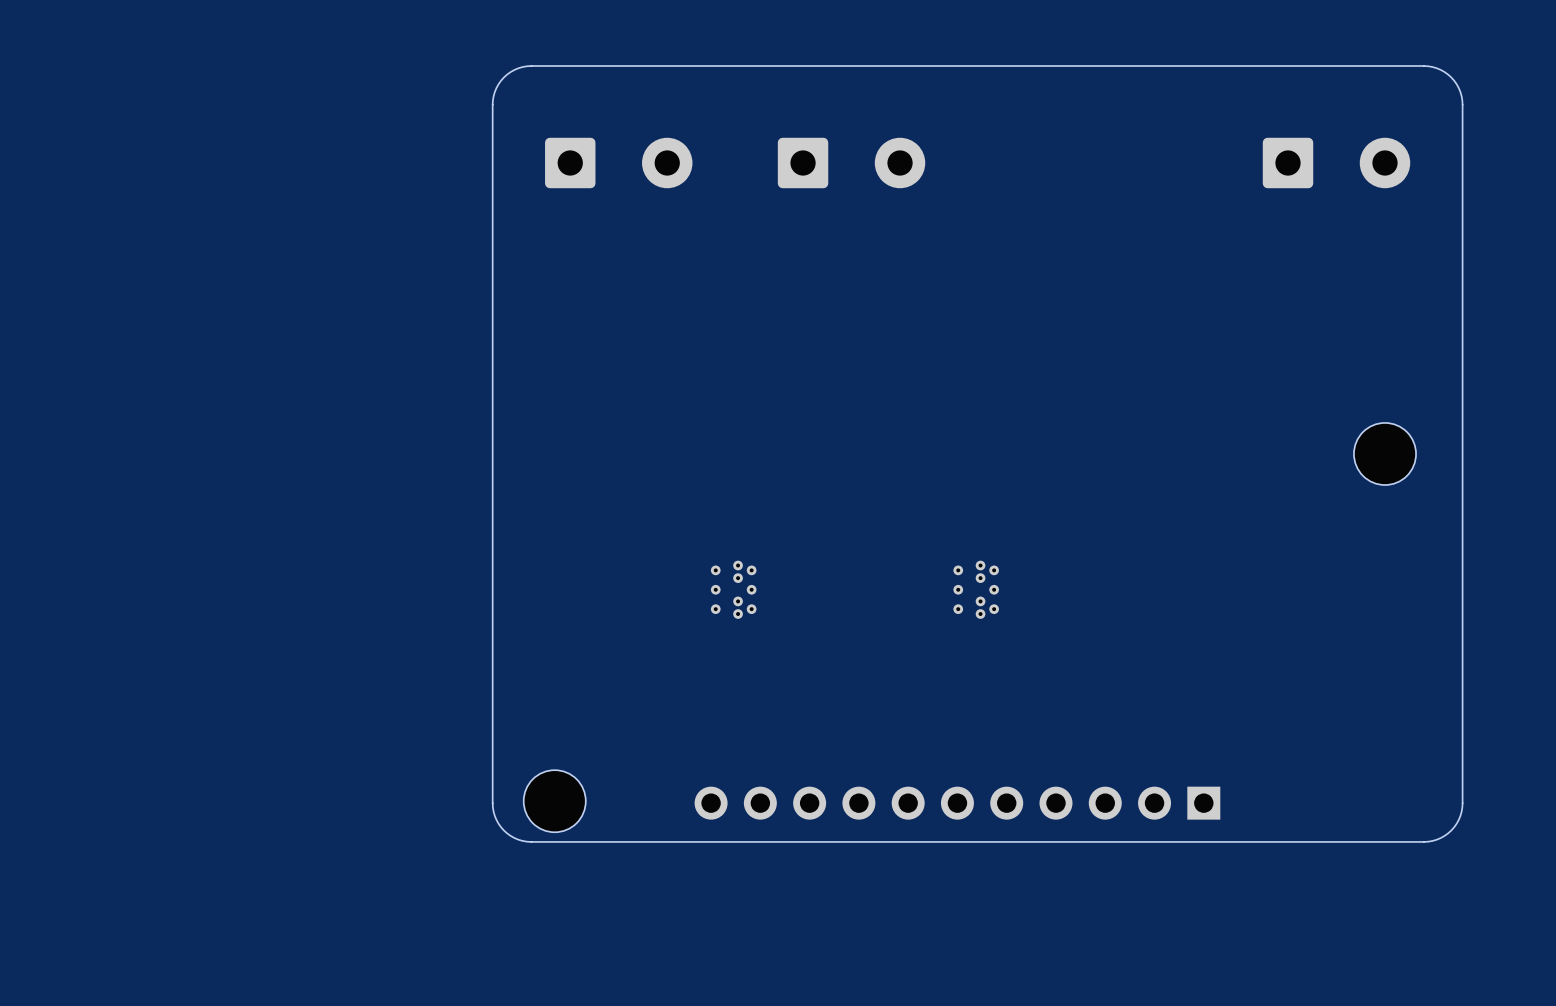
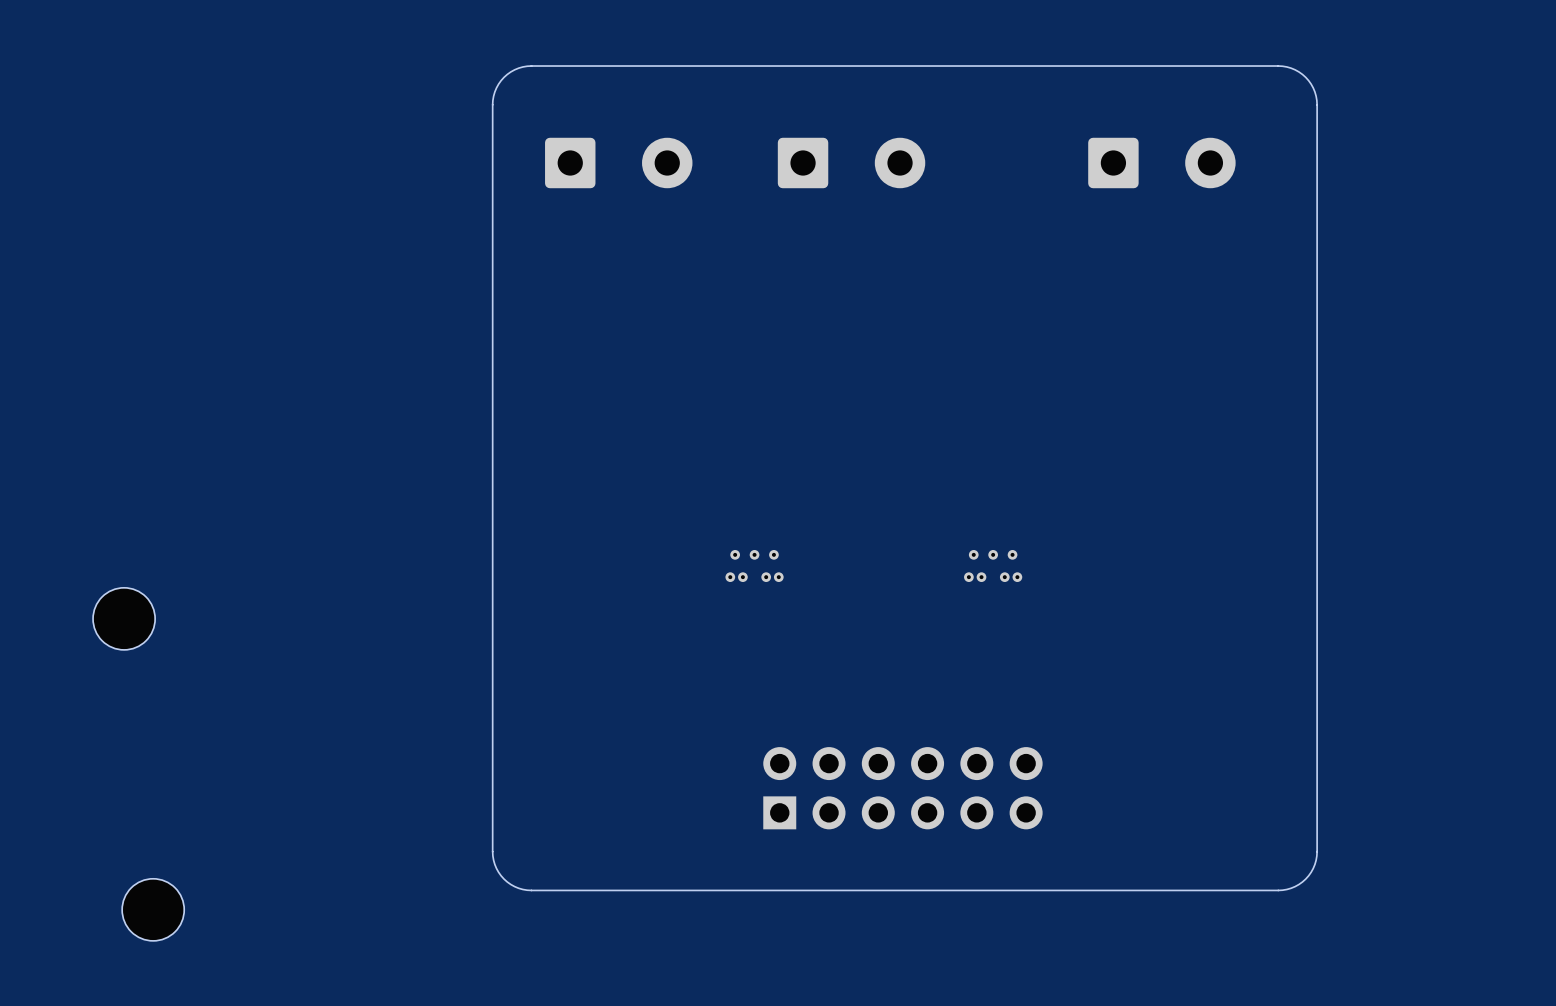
board edge: (1278, 66) (1428, 66) (1440, 69) (1451, 77) (1461, 96) (1462, 803) (1460, 815) (1451, 830) (1436, 839) (1423, 841) (531, 841) (514, 838) (504, 830) (494, 815) (492, 803) -> (1278, 66) (1291, 68) (1305, 77) (1313, 87) (1317, 104) (1317, 851) (1313, 868) (1305, 879) (1295, 886) (1278, 890) (527, 890) (507, 881) (494, 864) (492, 851) (492, 803)
part position: (1336, 163) -> (1161, 163)
part: (1385, 453) -> none
part: none -> (754, 566)
part: none -> (993, 566)
part: (733, 589) -> none
part: (976, 589) -> none
part: none -> (124, 618)
part: none -> (902, 788)
part: (554, 801) -> none
part: (957, 803) -> none
part: none -> (153, 909)

